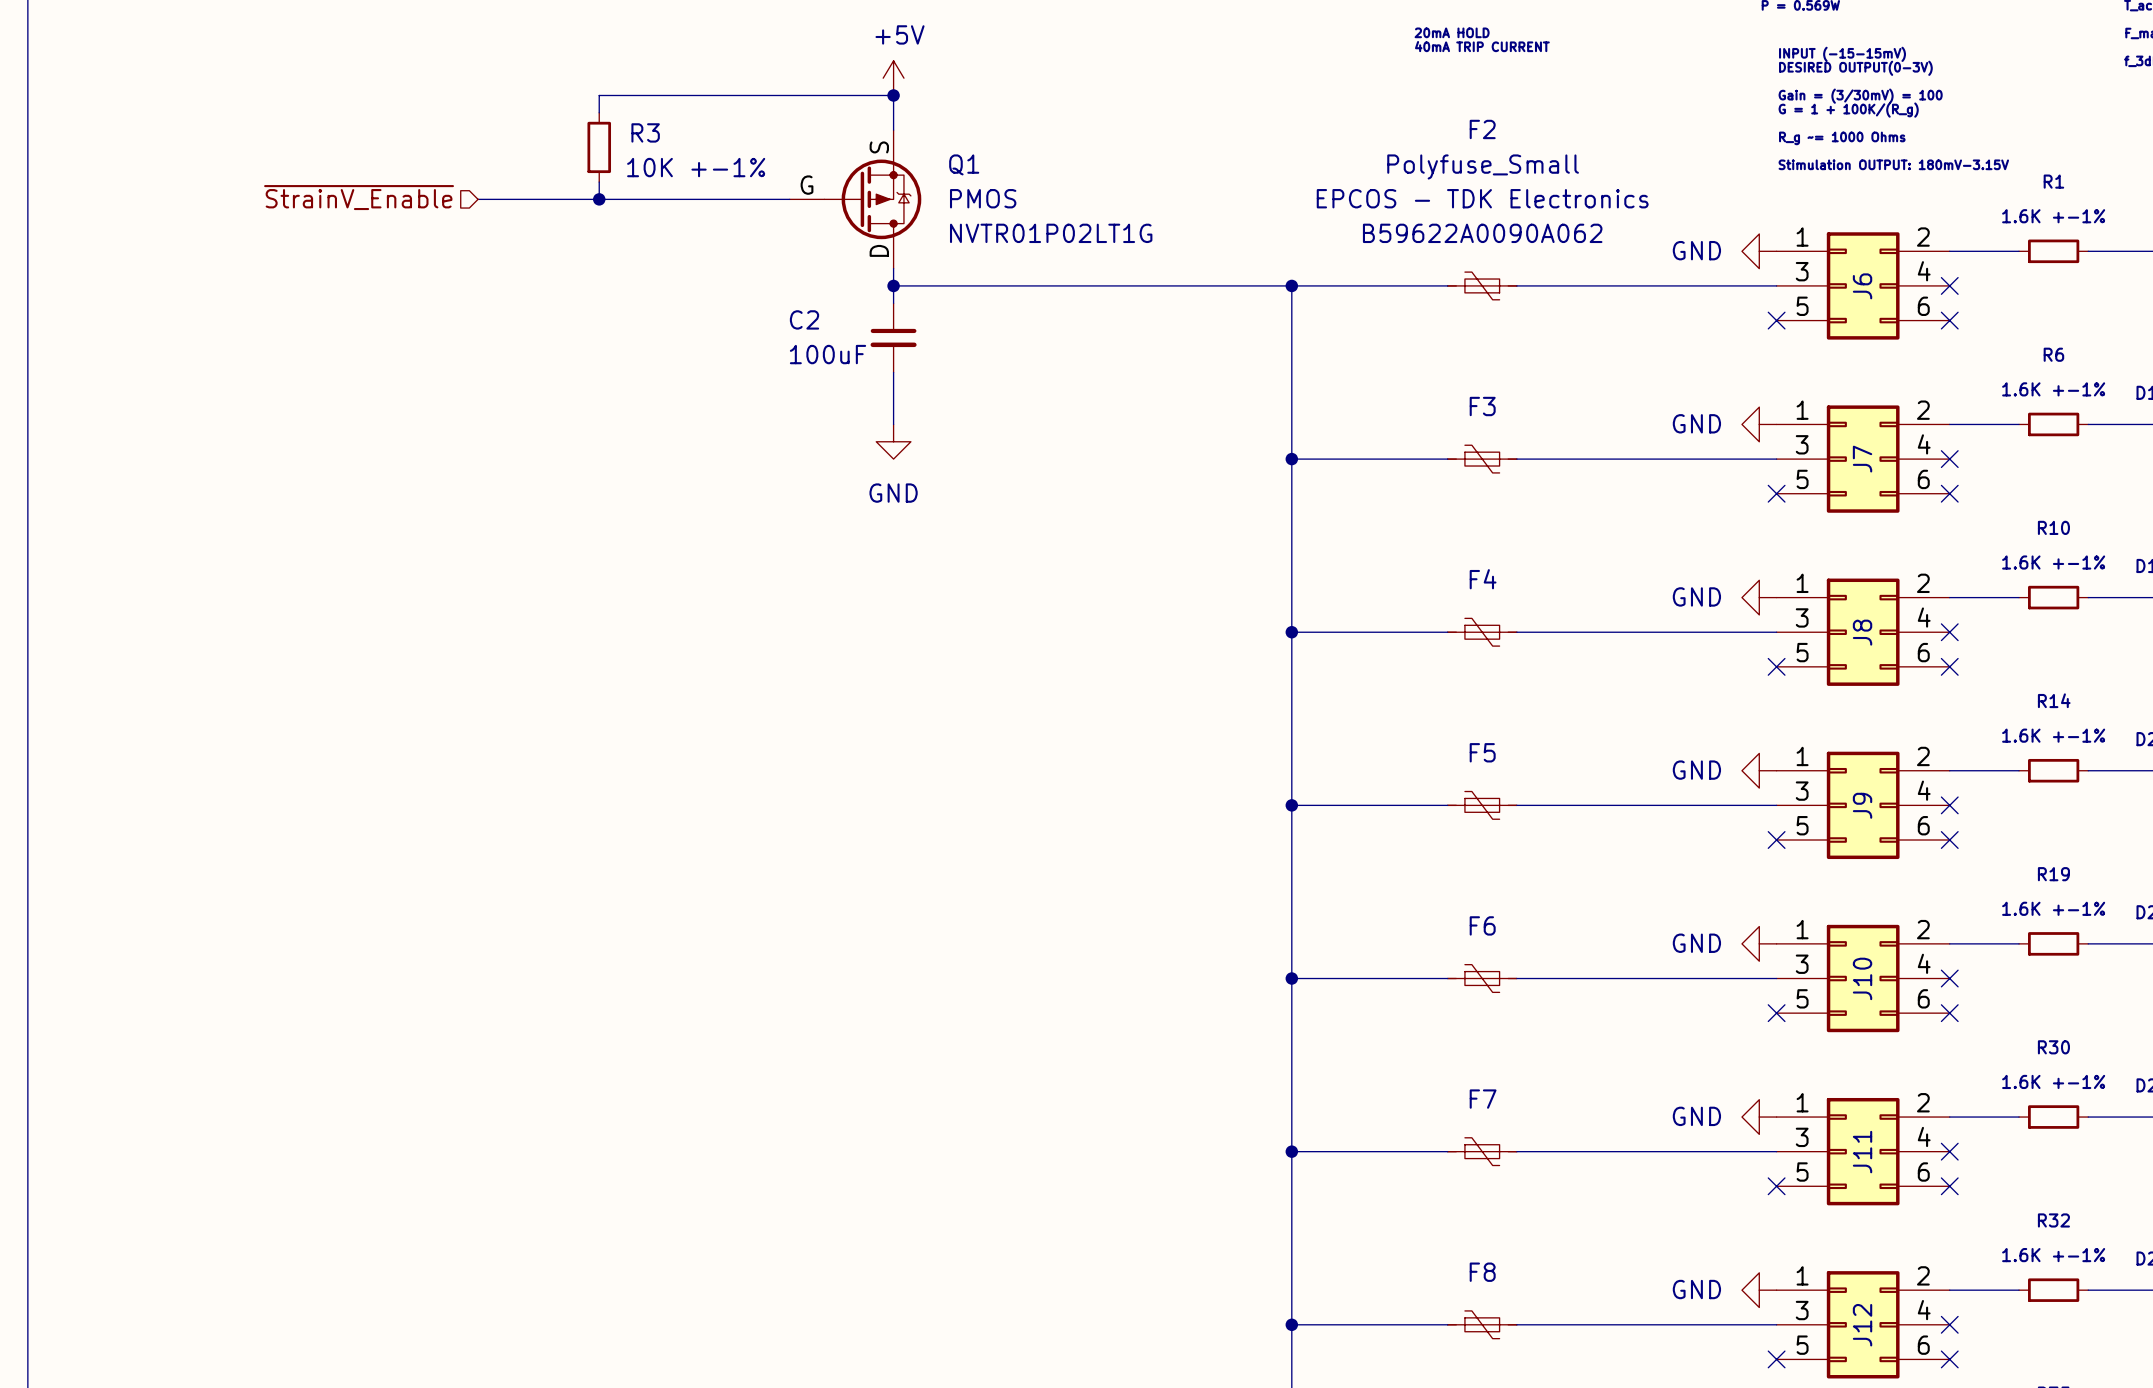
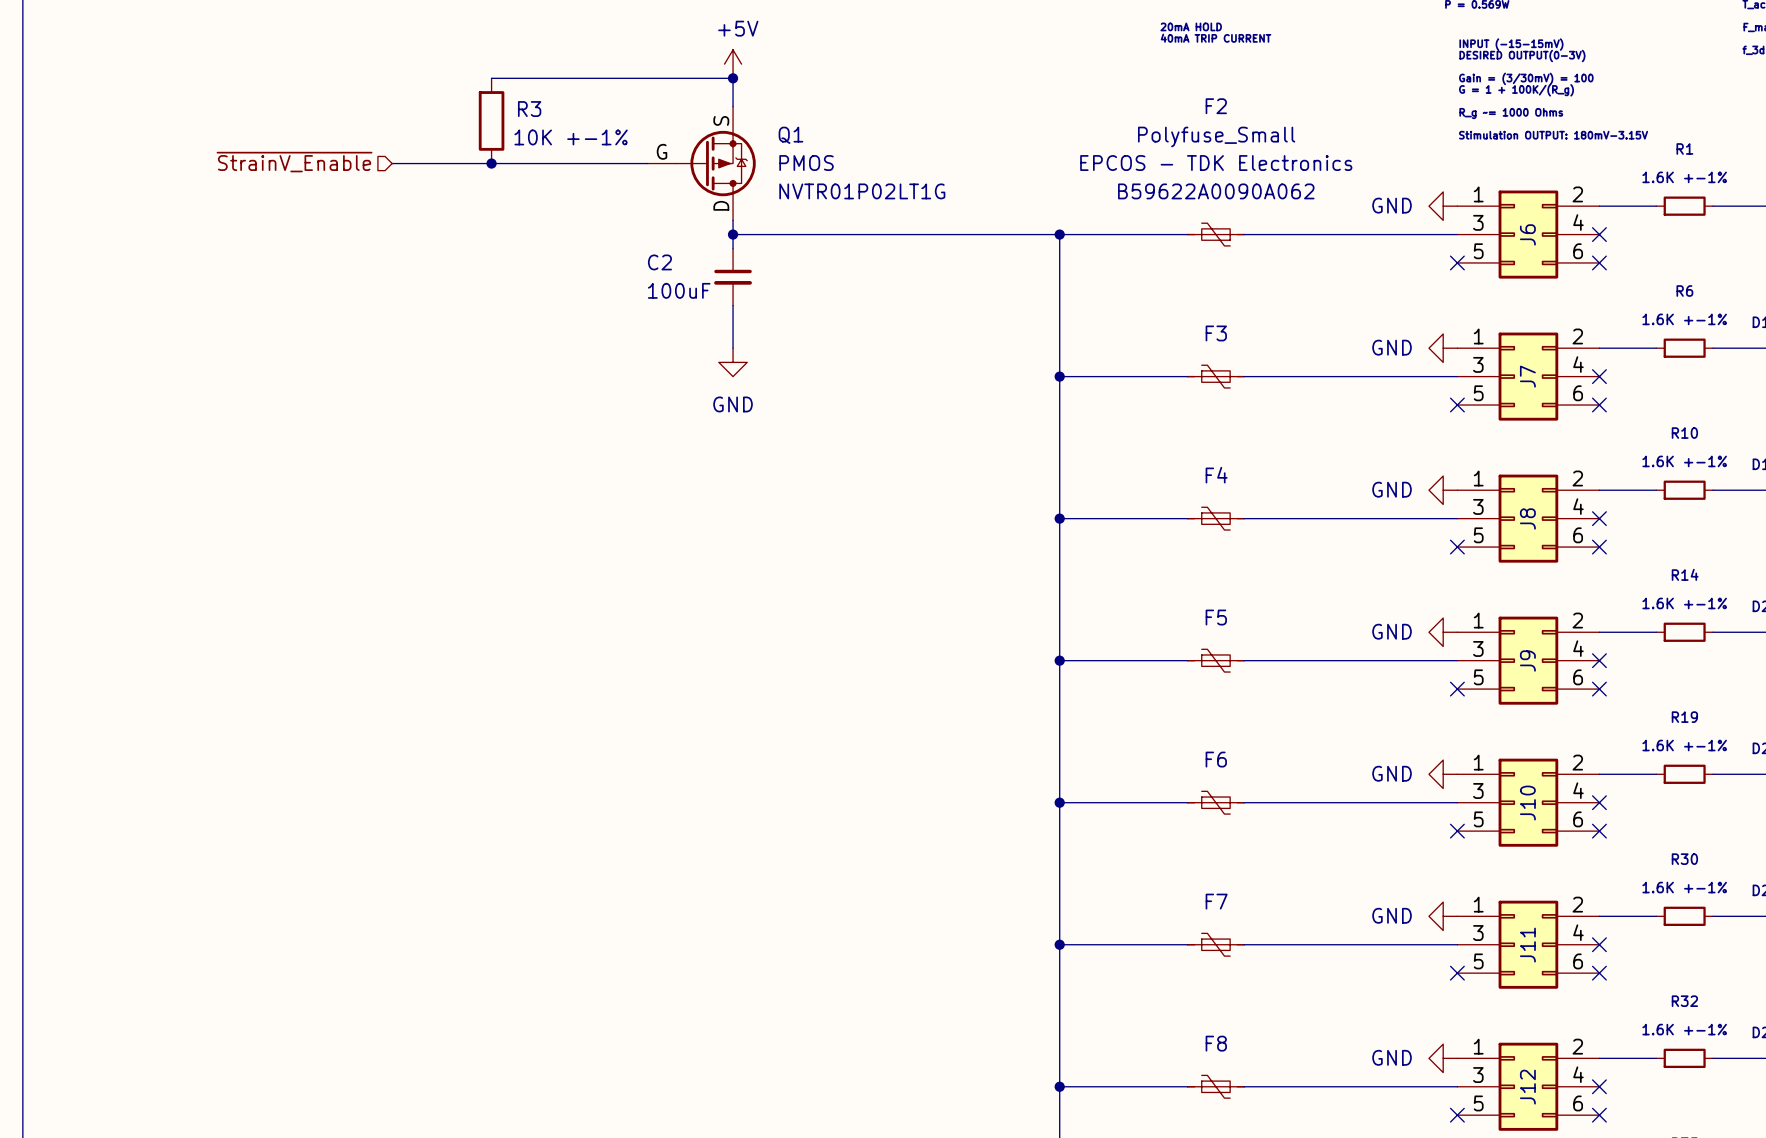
R3 symbol: [587, 112, 612, 183] -> [478, 78, 505, 164]

